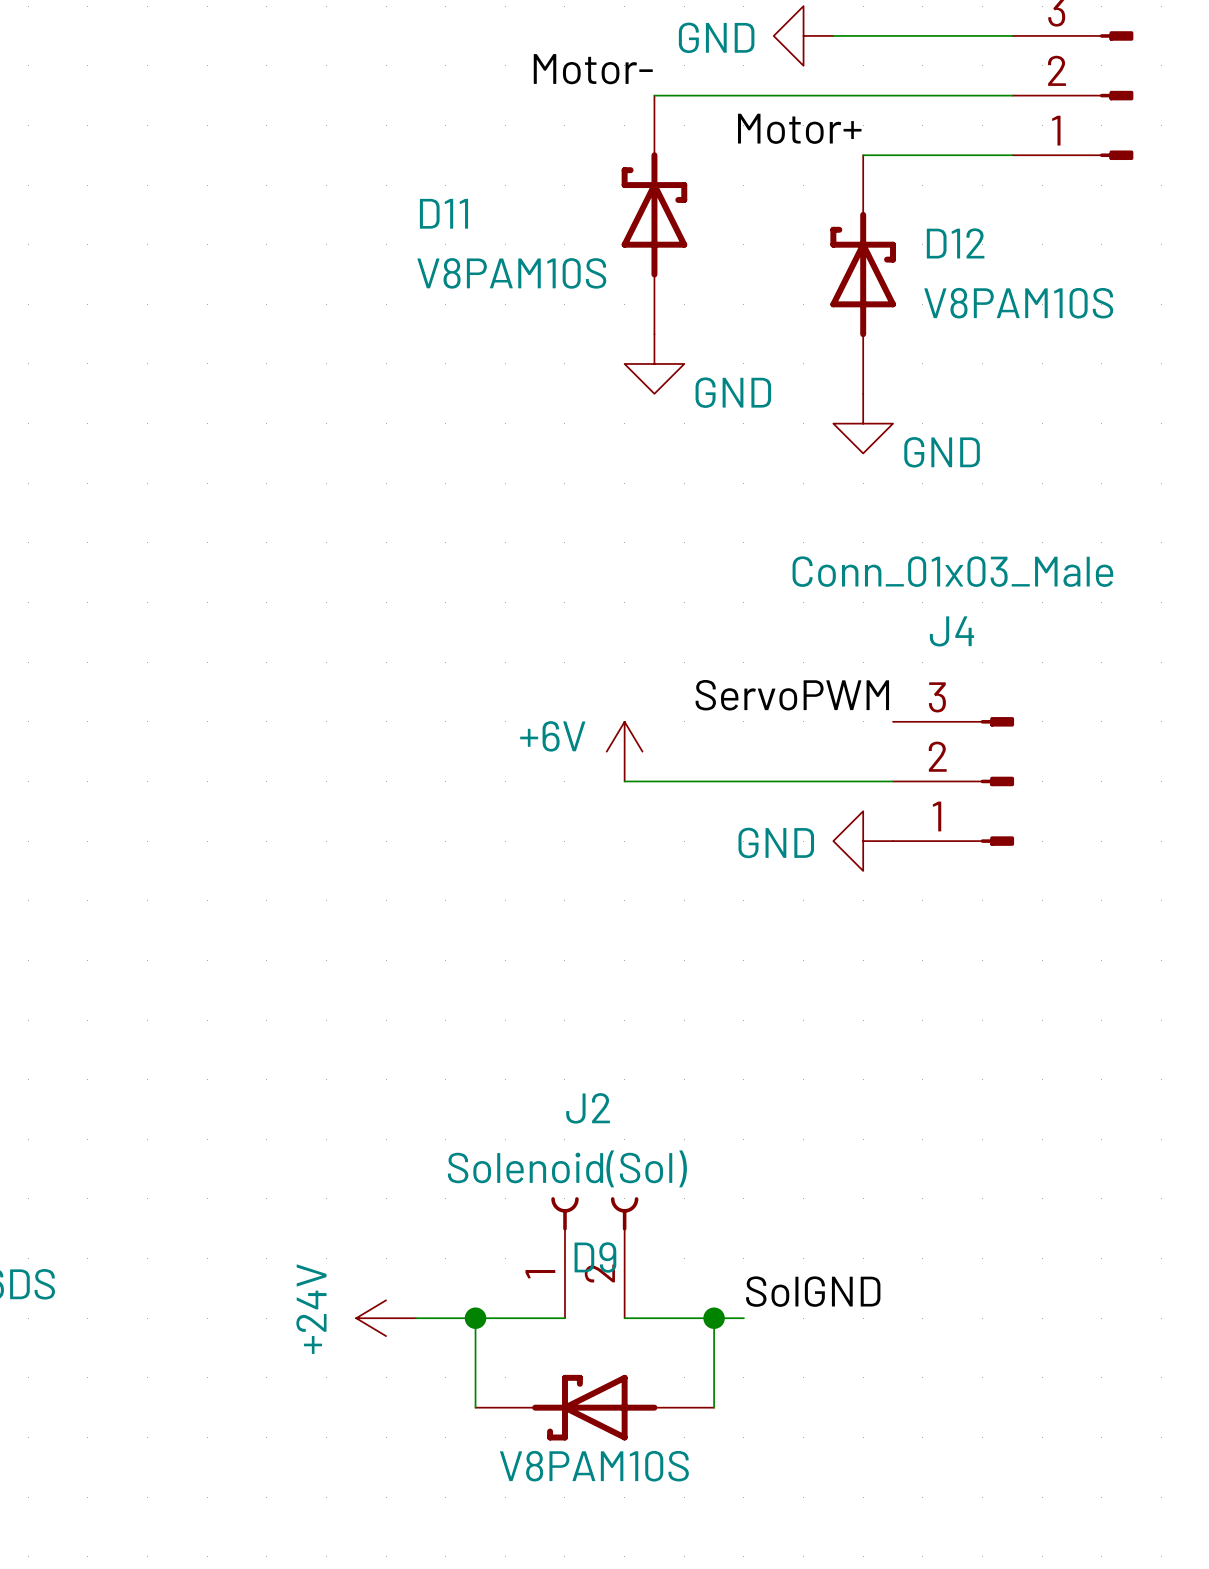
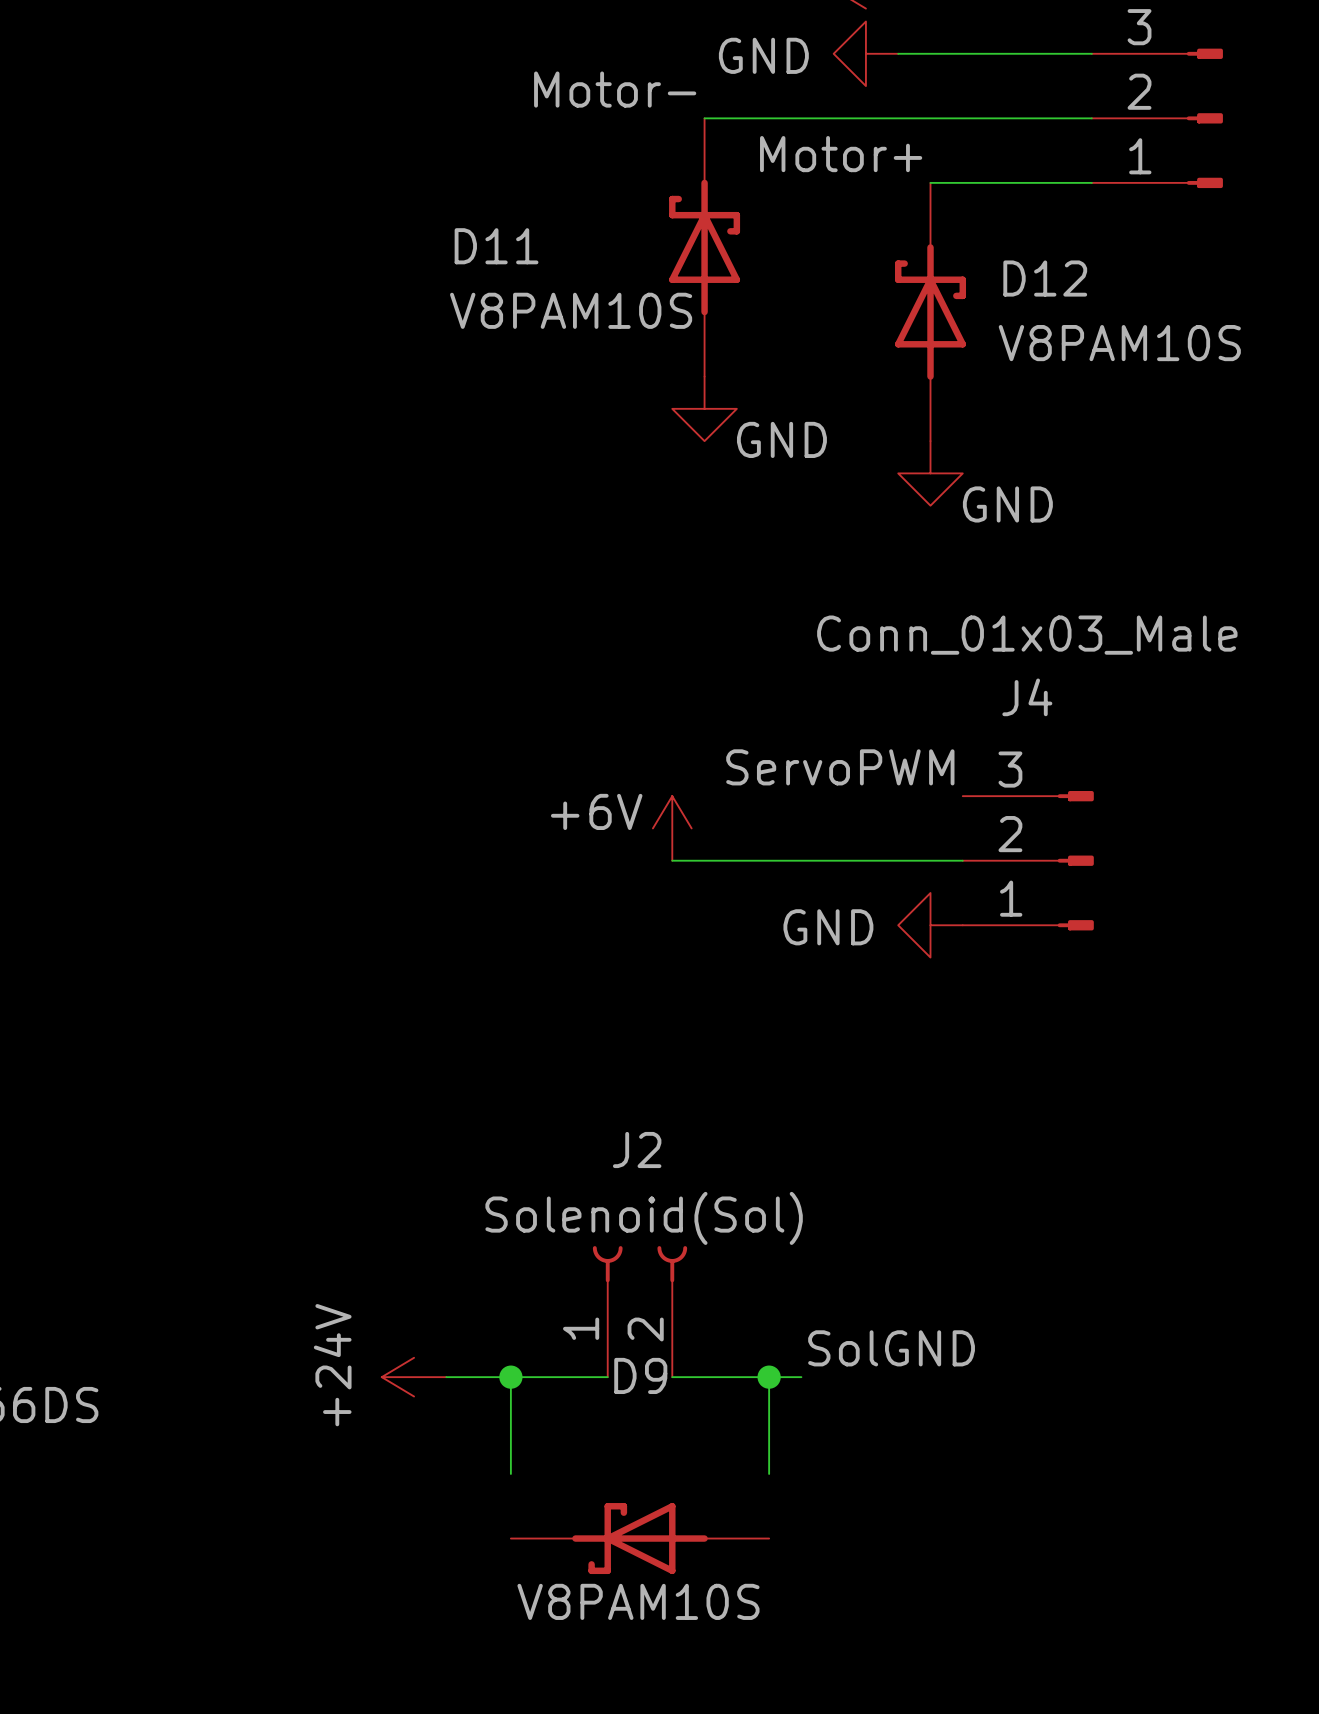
J2 position: (594, 1257) -> (640, 1311)
label position: SolGND (813, 1291) -> SolGND (891, 1348)
power symbol position: +24V (386, 1318) -> +24V (414, 1377)
wire: (415, 1318) (564, 1318) -> (446, 1377) (607, 1377)
junction position: (475, 1318) -> (510, 1377)
wire: (624, 1318) (743, 1318) -> (672, 1377) (801, 1377)
junction position: (714, 1318) -> (769, 1377)
wire: (475, 1348) (475, 1407) -> (510, 1377) (510, 1441)
wire: (714, 1348) (714, 1407) -> (769, 1377) (769, 1441)

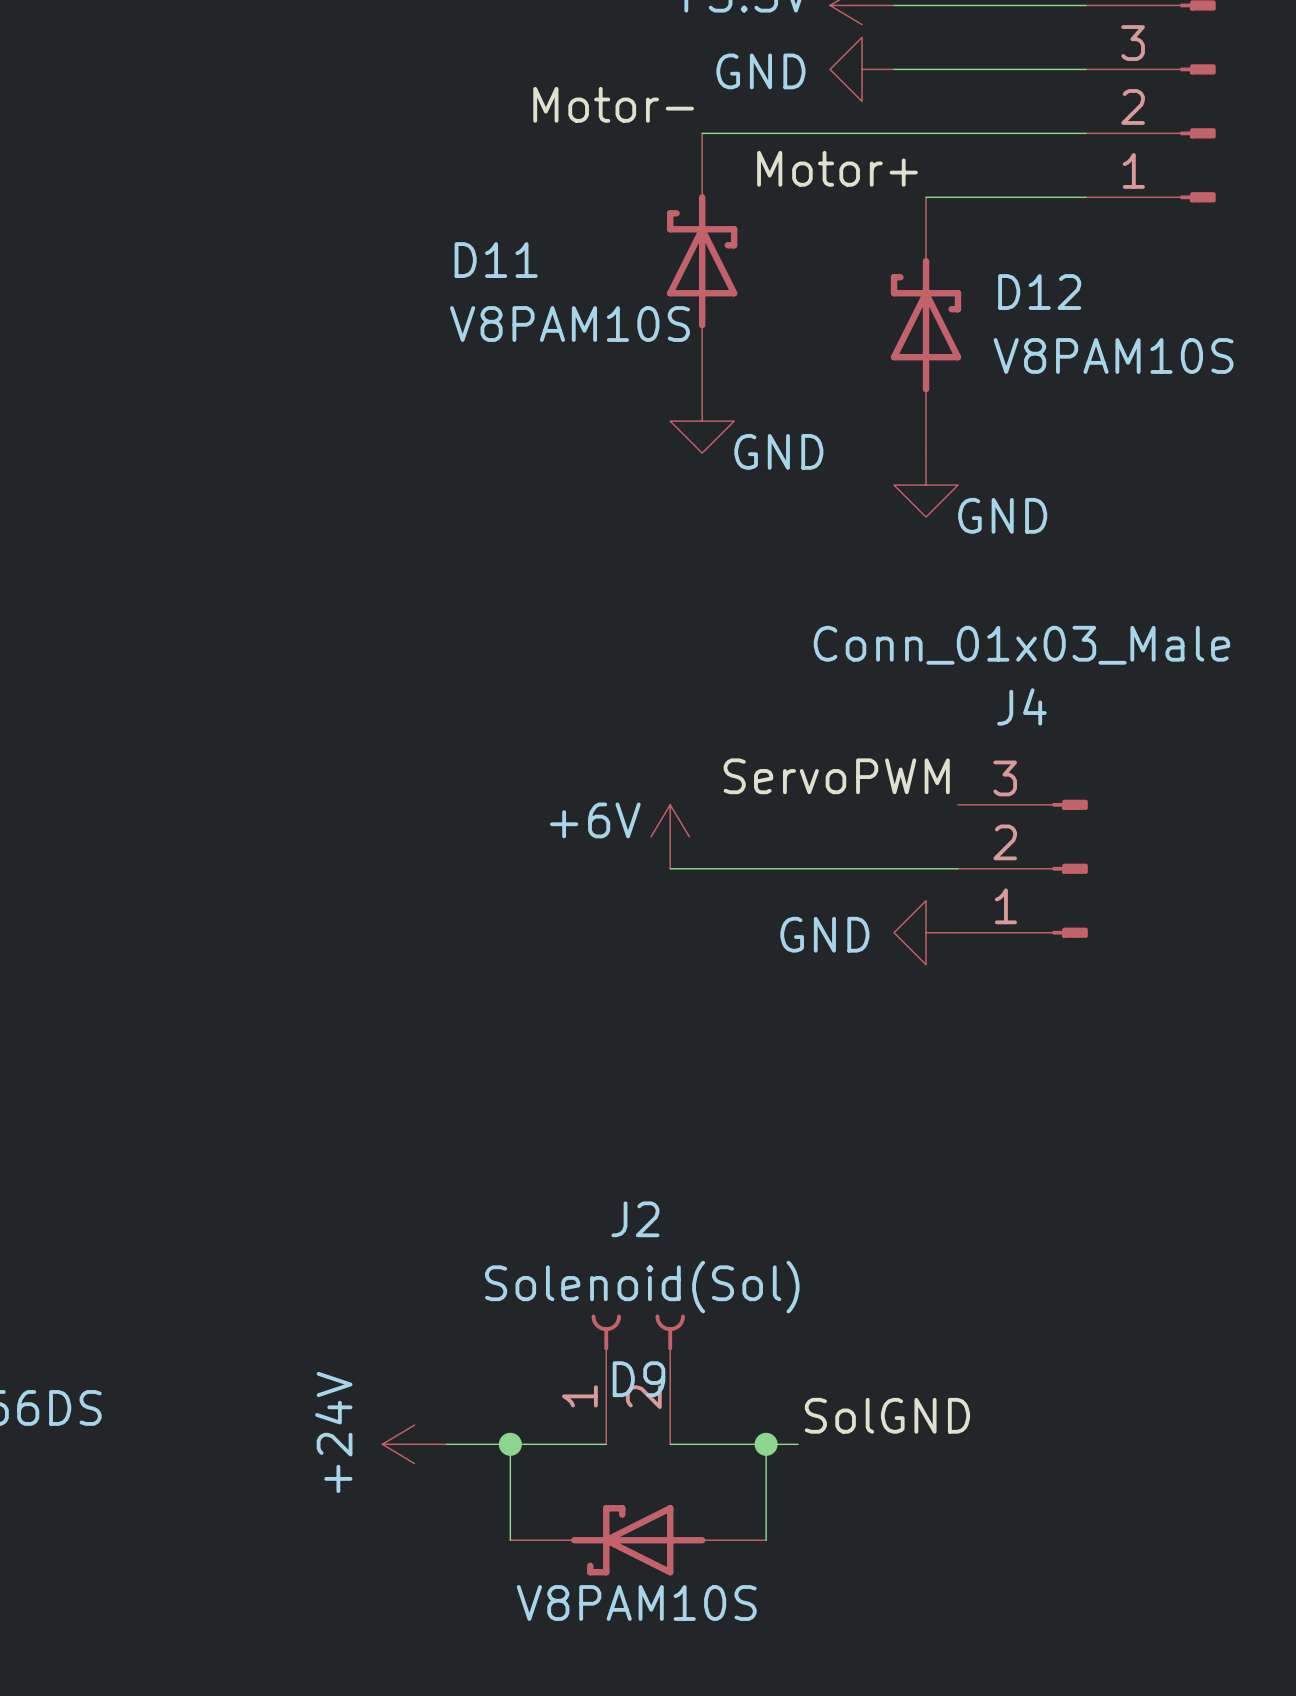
J2 position: (640, 1311) -> (638, 1379)
label position: SolGND (891, 1348) -> SolGND (887, 1415)
power symbol position: +24V (414, 1377) -> +24V (414, 1444)
wire: (446, 1377) (607, 1377) -> (446, 1444) (606, 1444)
wire: (510, 1377) (510, 1441) -> (510, 1476) (510, 1540)
junction position: (510, 1377) -> (510, 1444)
wire: (672, 1377) (801, 1377) -> (670, 1444) (798, 1444)
wire: (769, 1377) (769, 1441) -> (766, 1476) (766, 1540)
junction position: (769, 1377) -> (766, 1444)

